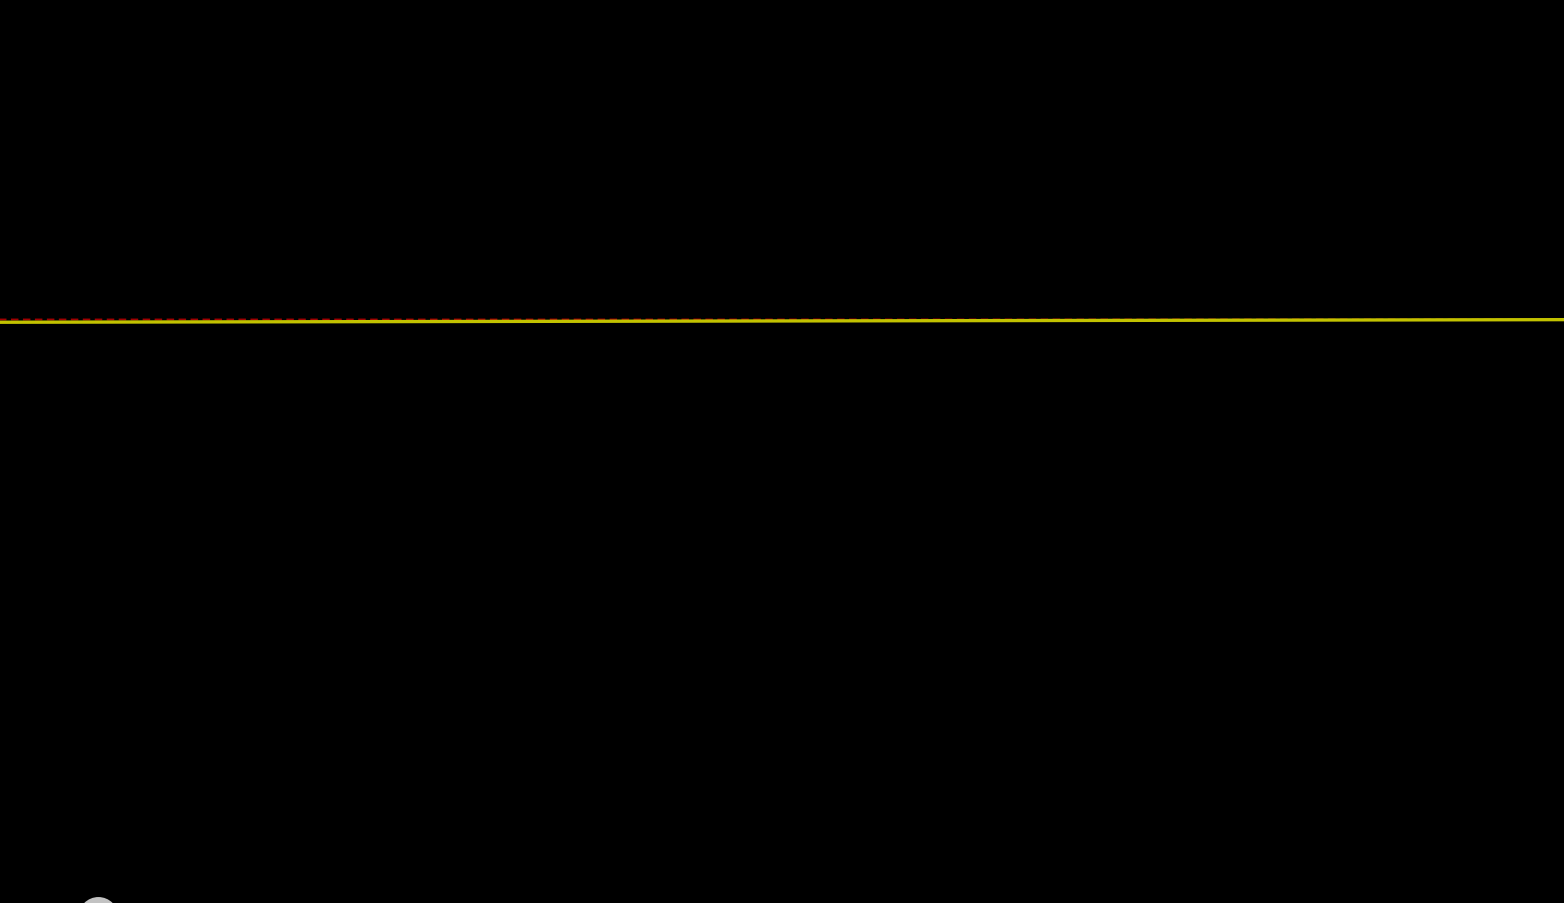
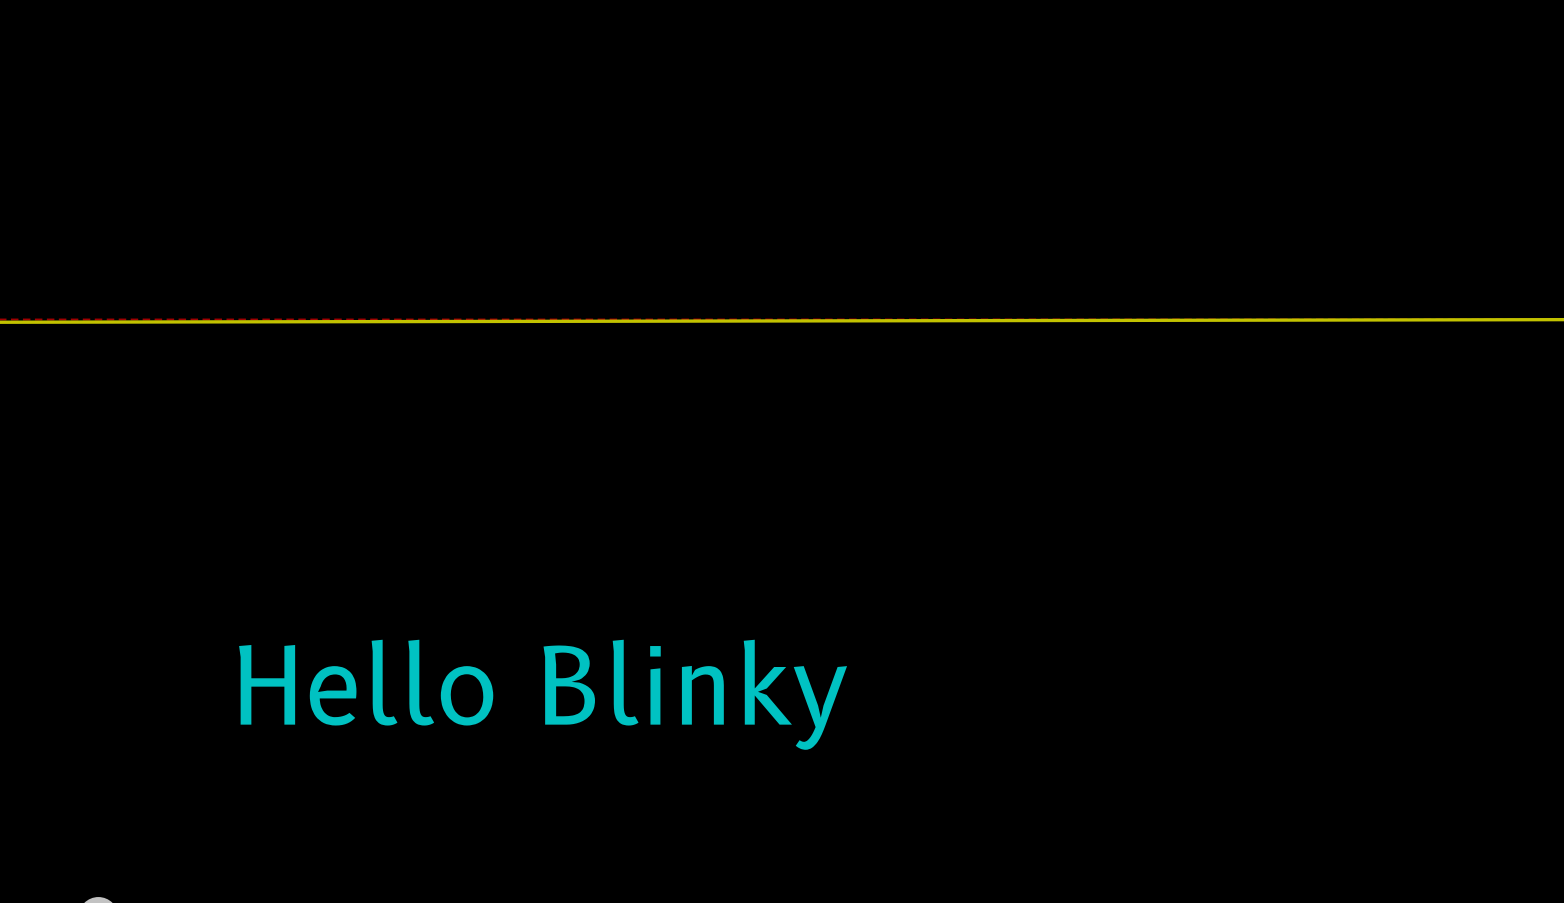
text: none -> Hello Blinky (543, 694)

